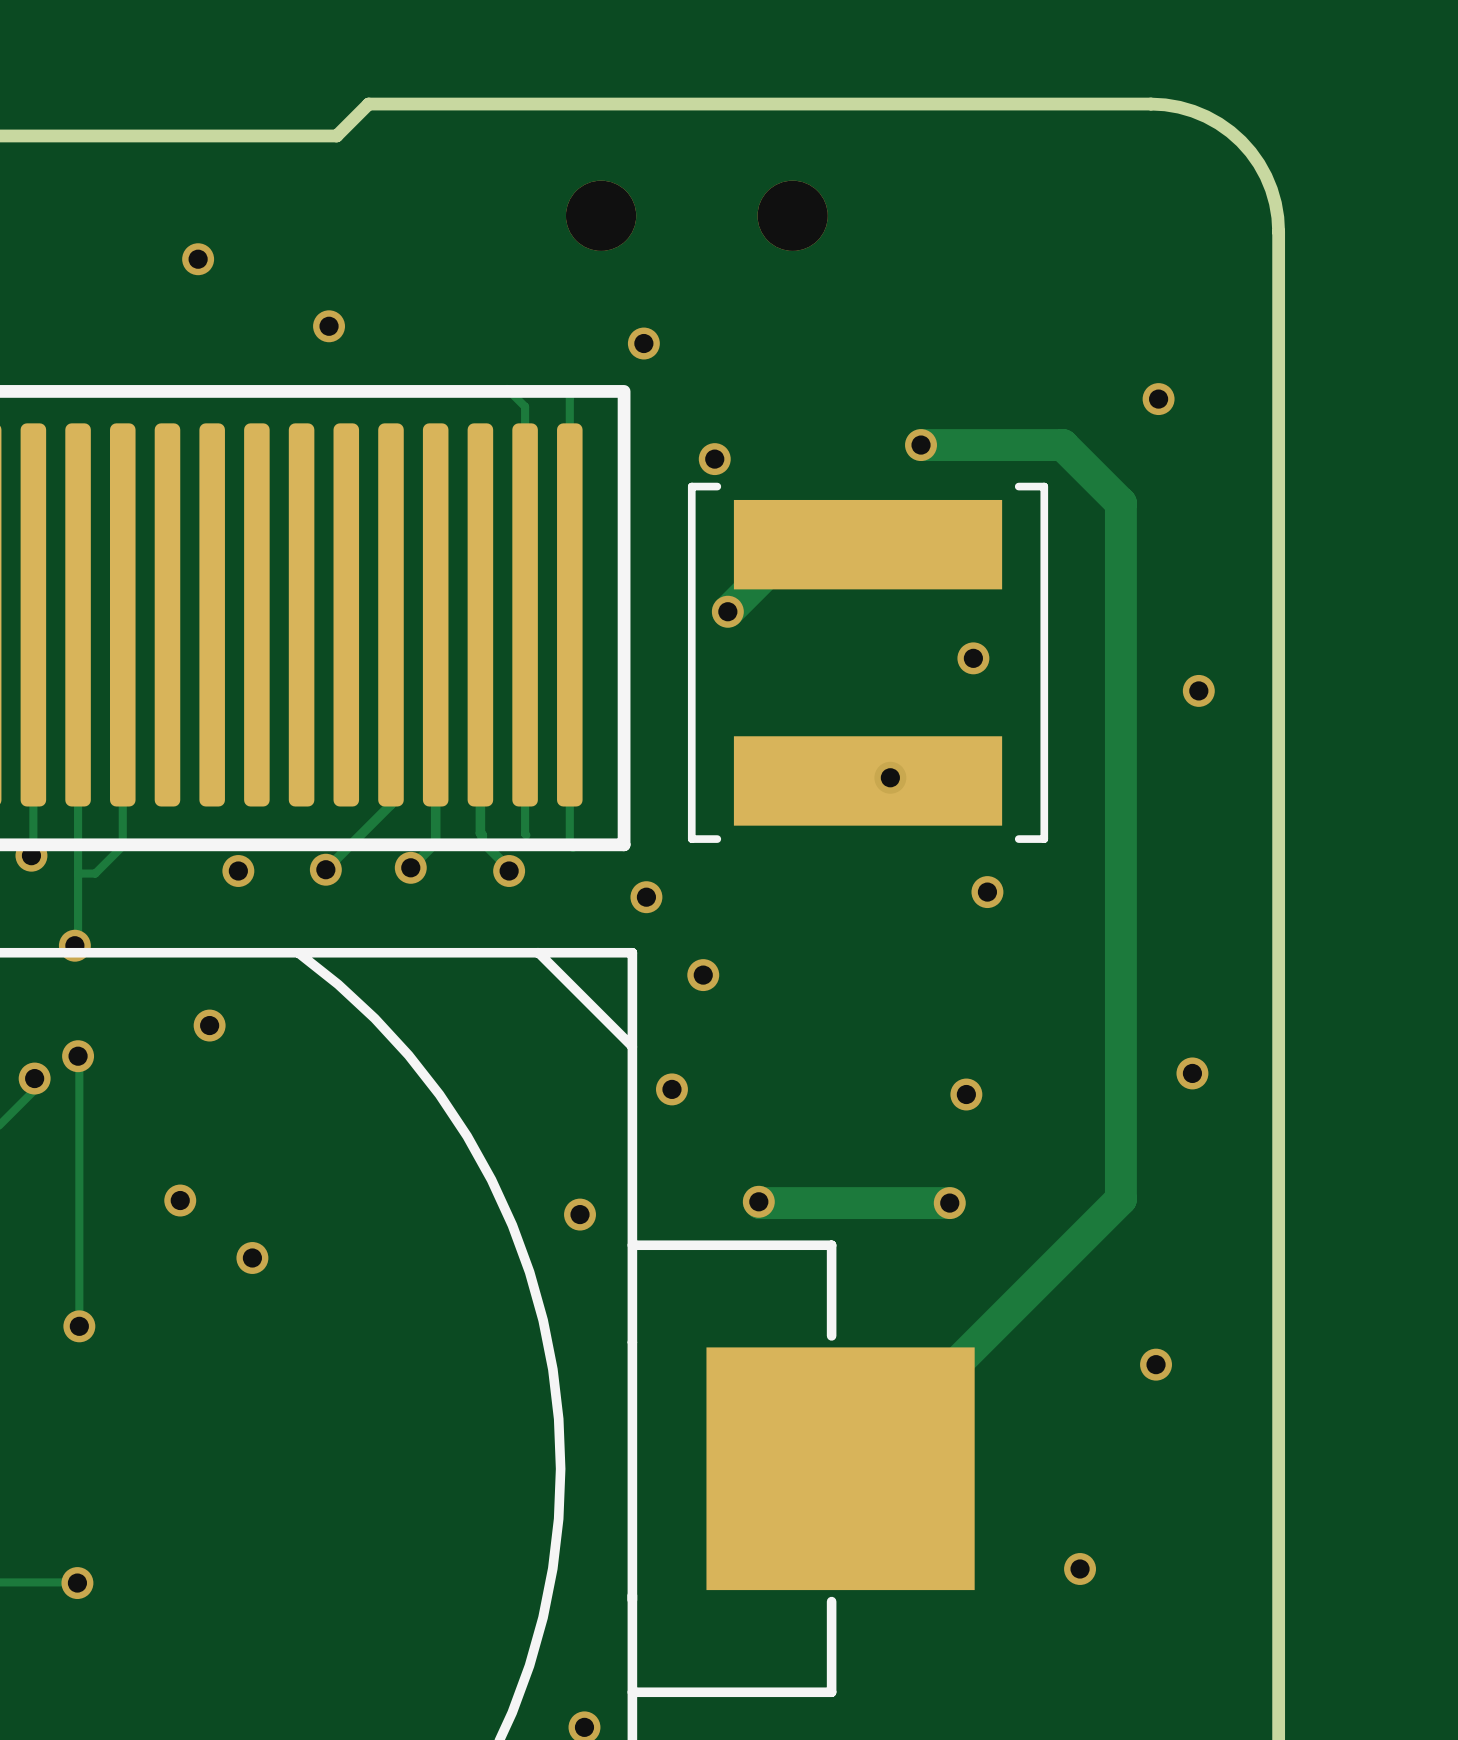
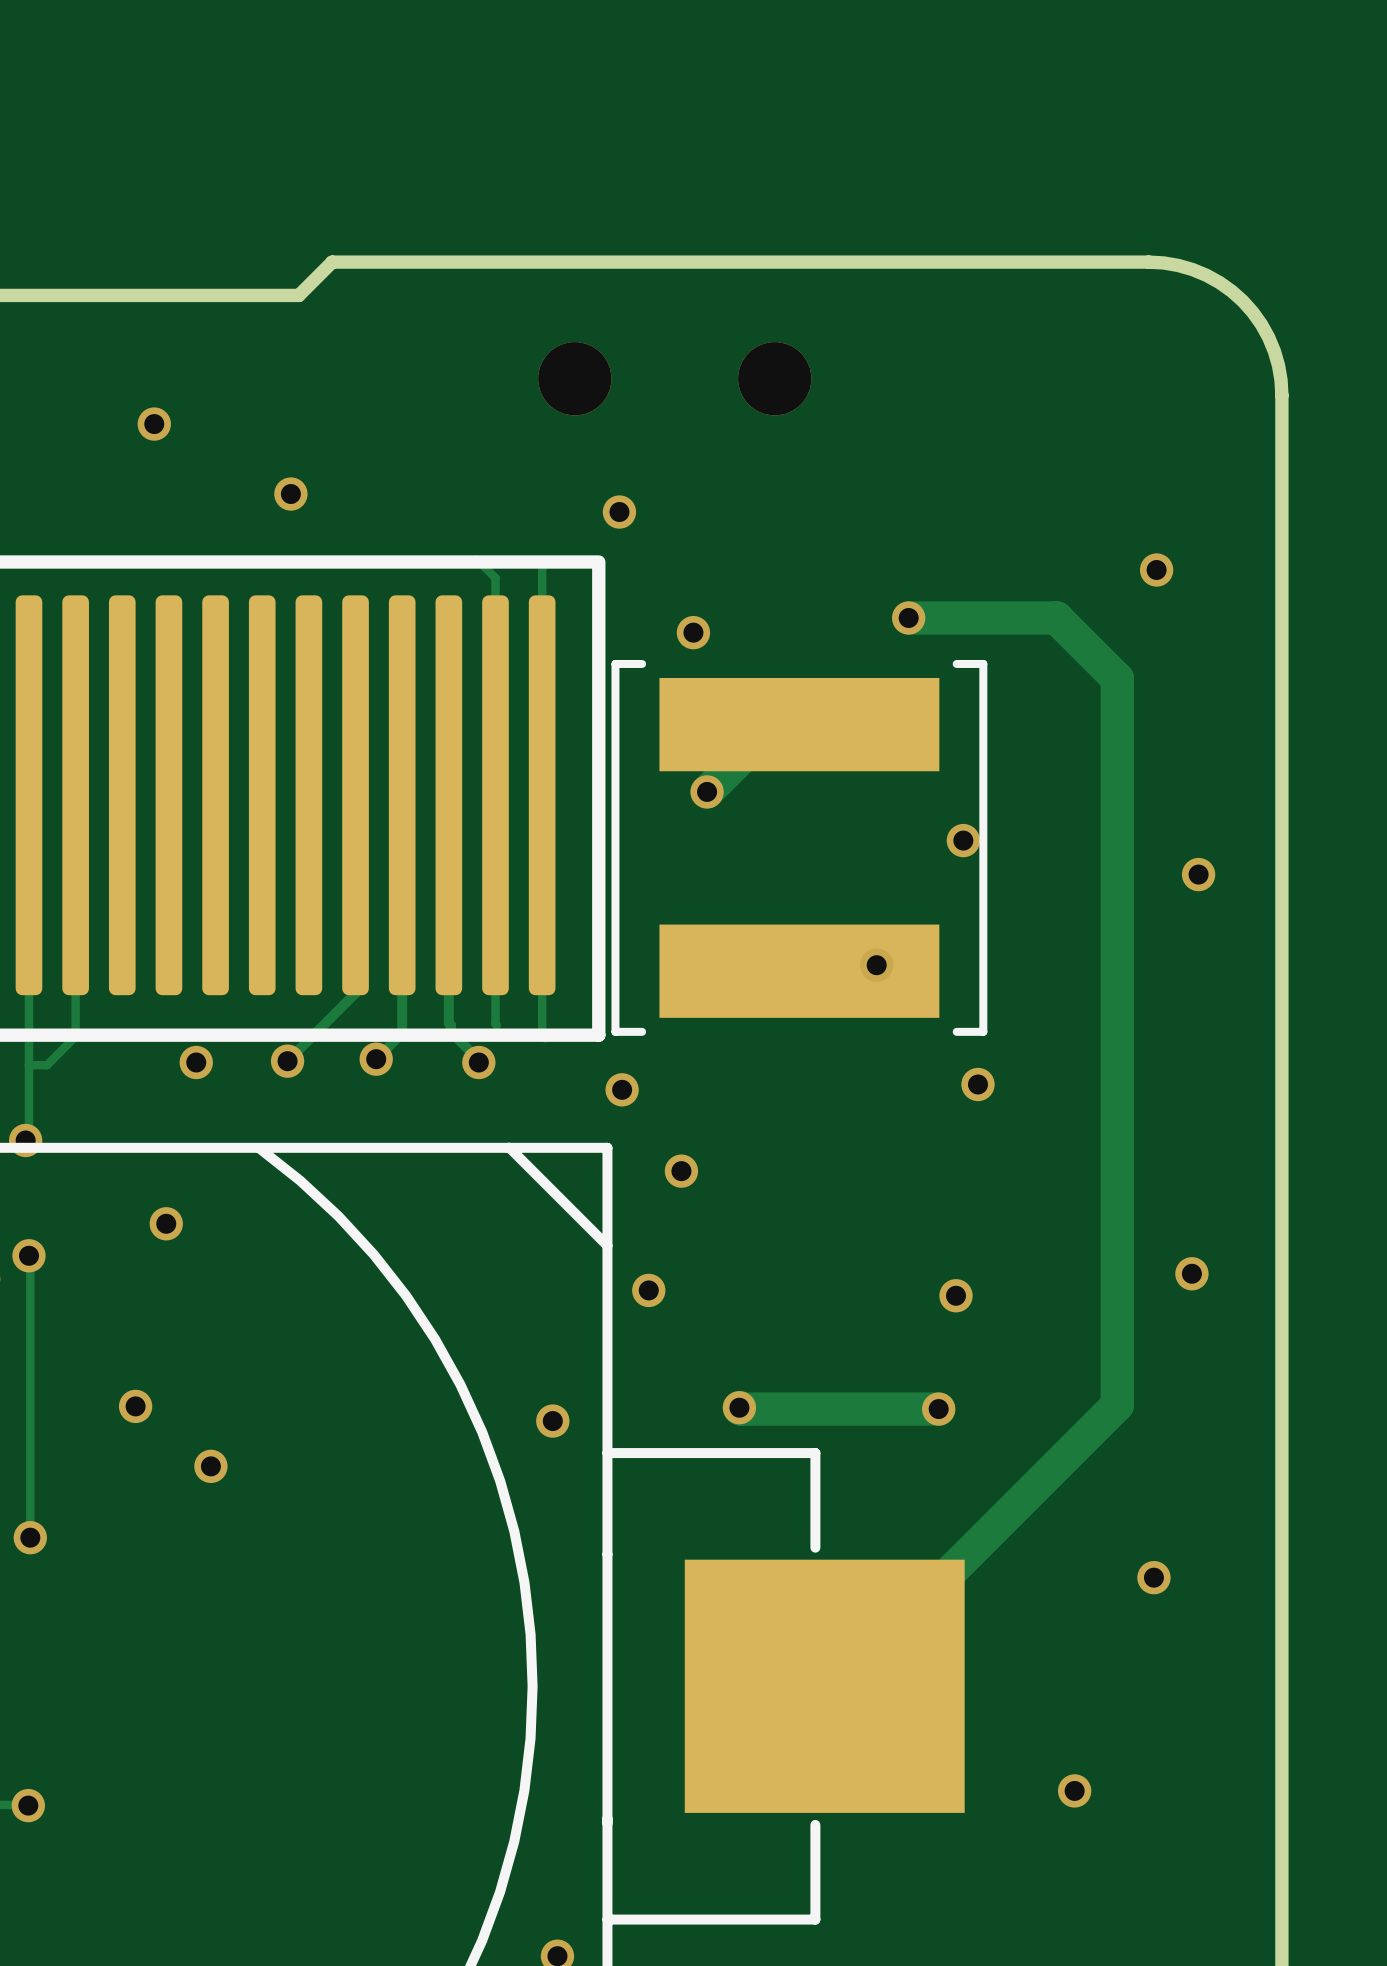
part position: (868, 662) -> (799, 847)

